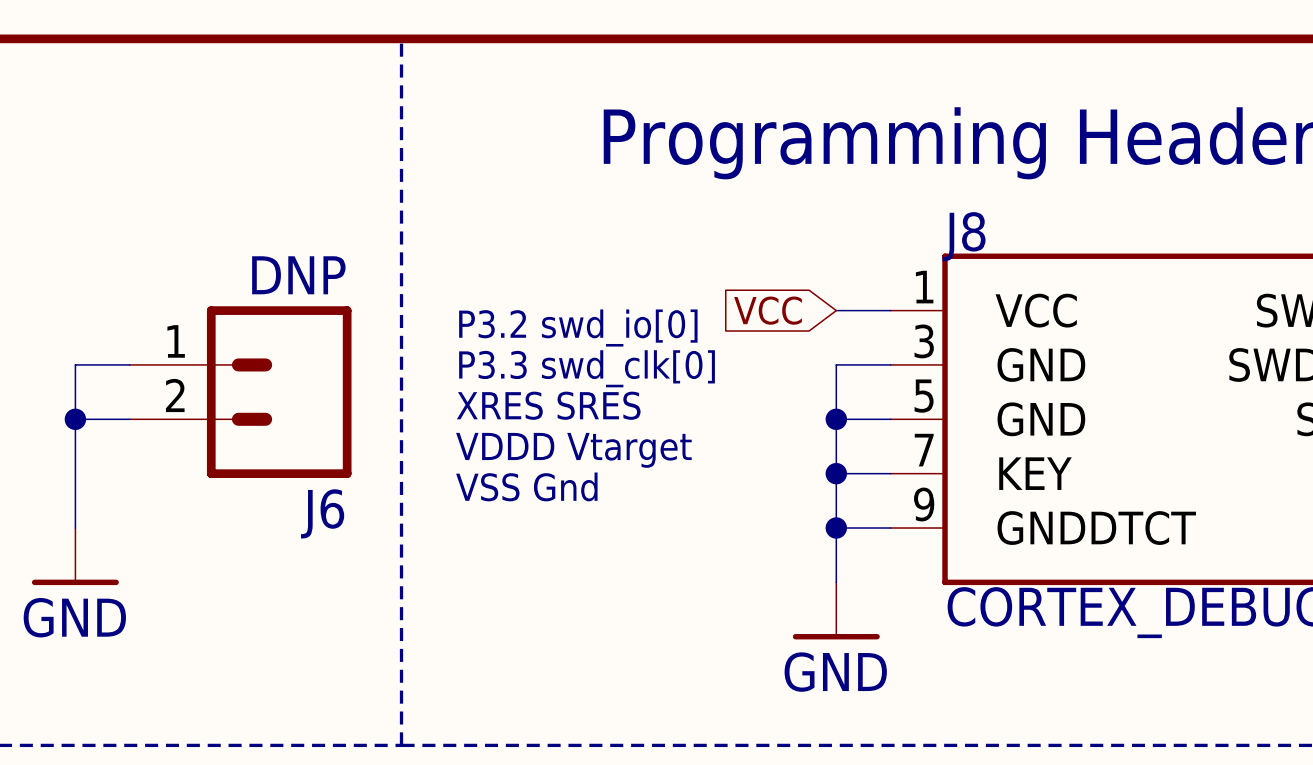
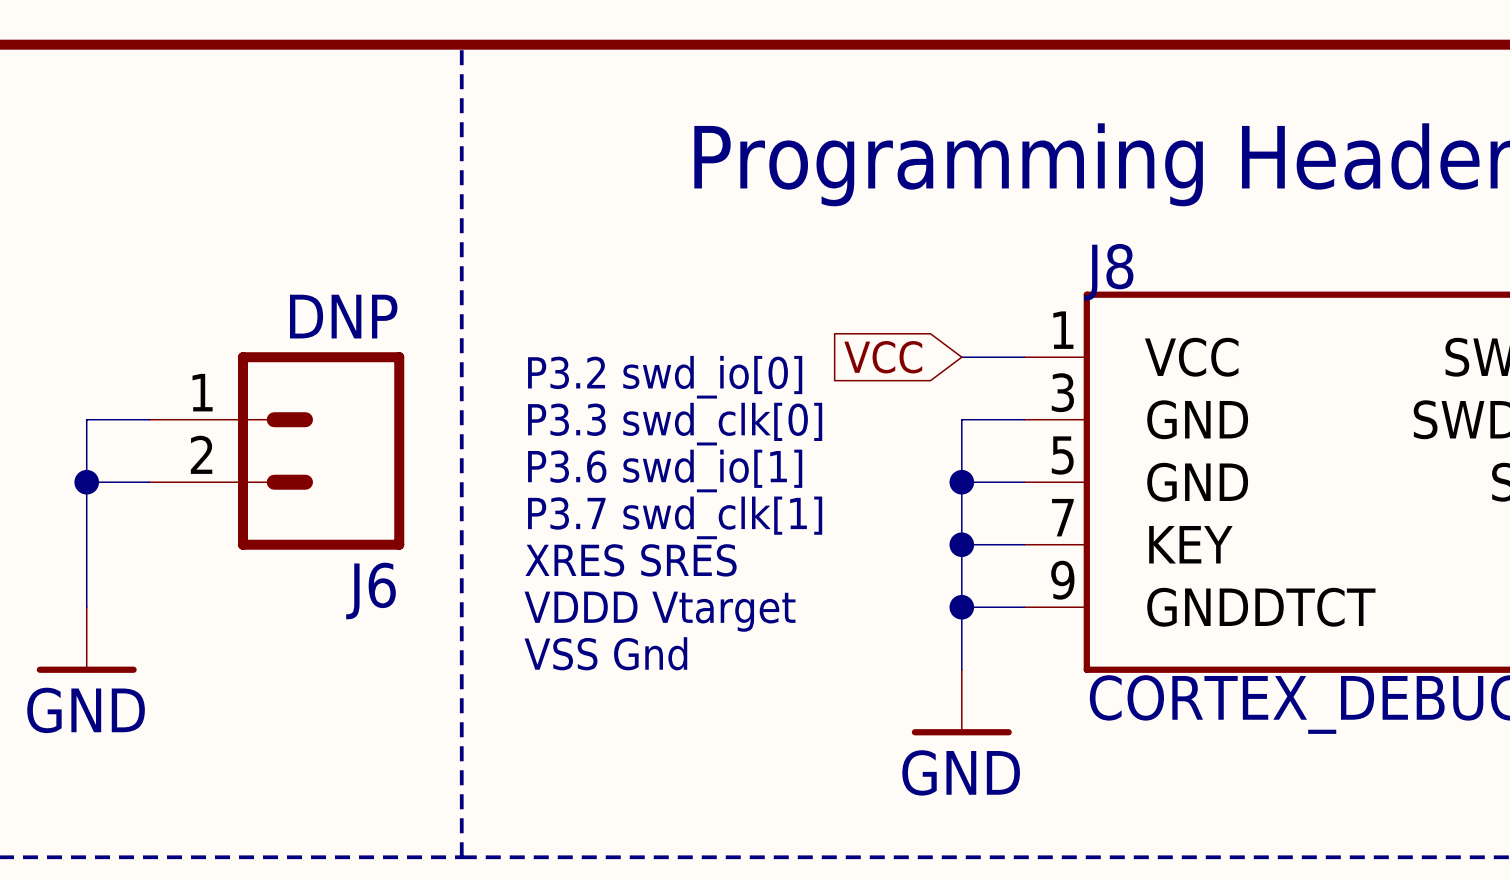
text: XRES SRES (548, 405) -> P3.6 swd_io[1] (665, 470)
text: VDDD Vtarget (573, 450) -> P3.7 swd_clk[1] (675, 517)
text: VSS Gnd (526, 486) -> XRES SRES (631, 560)
text: none -> VDDD Vtarget (660, 611)
text: none -> VSS Gnd (605, 653)

